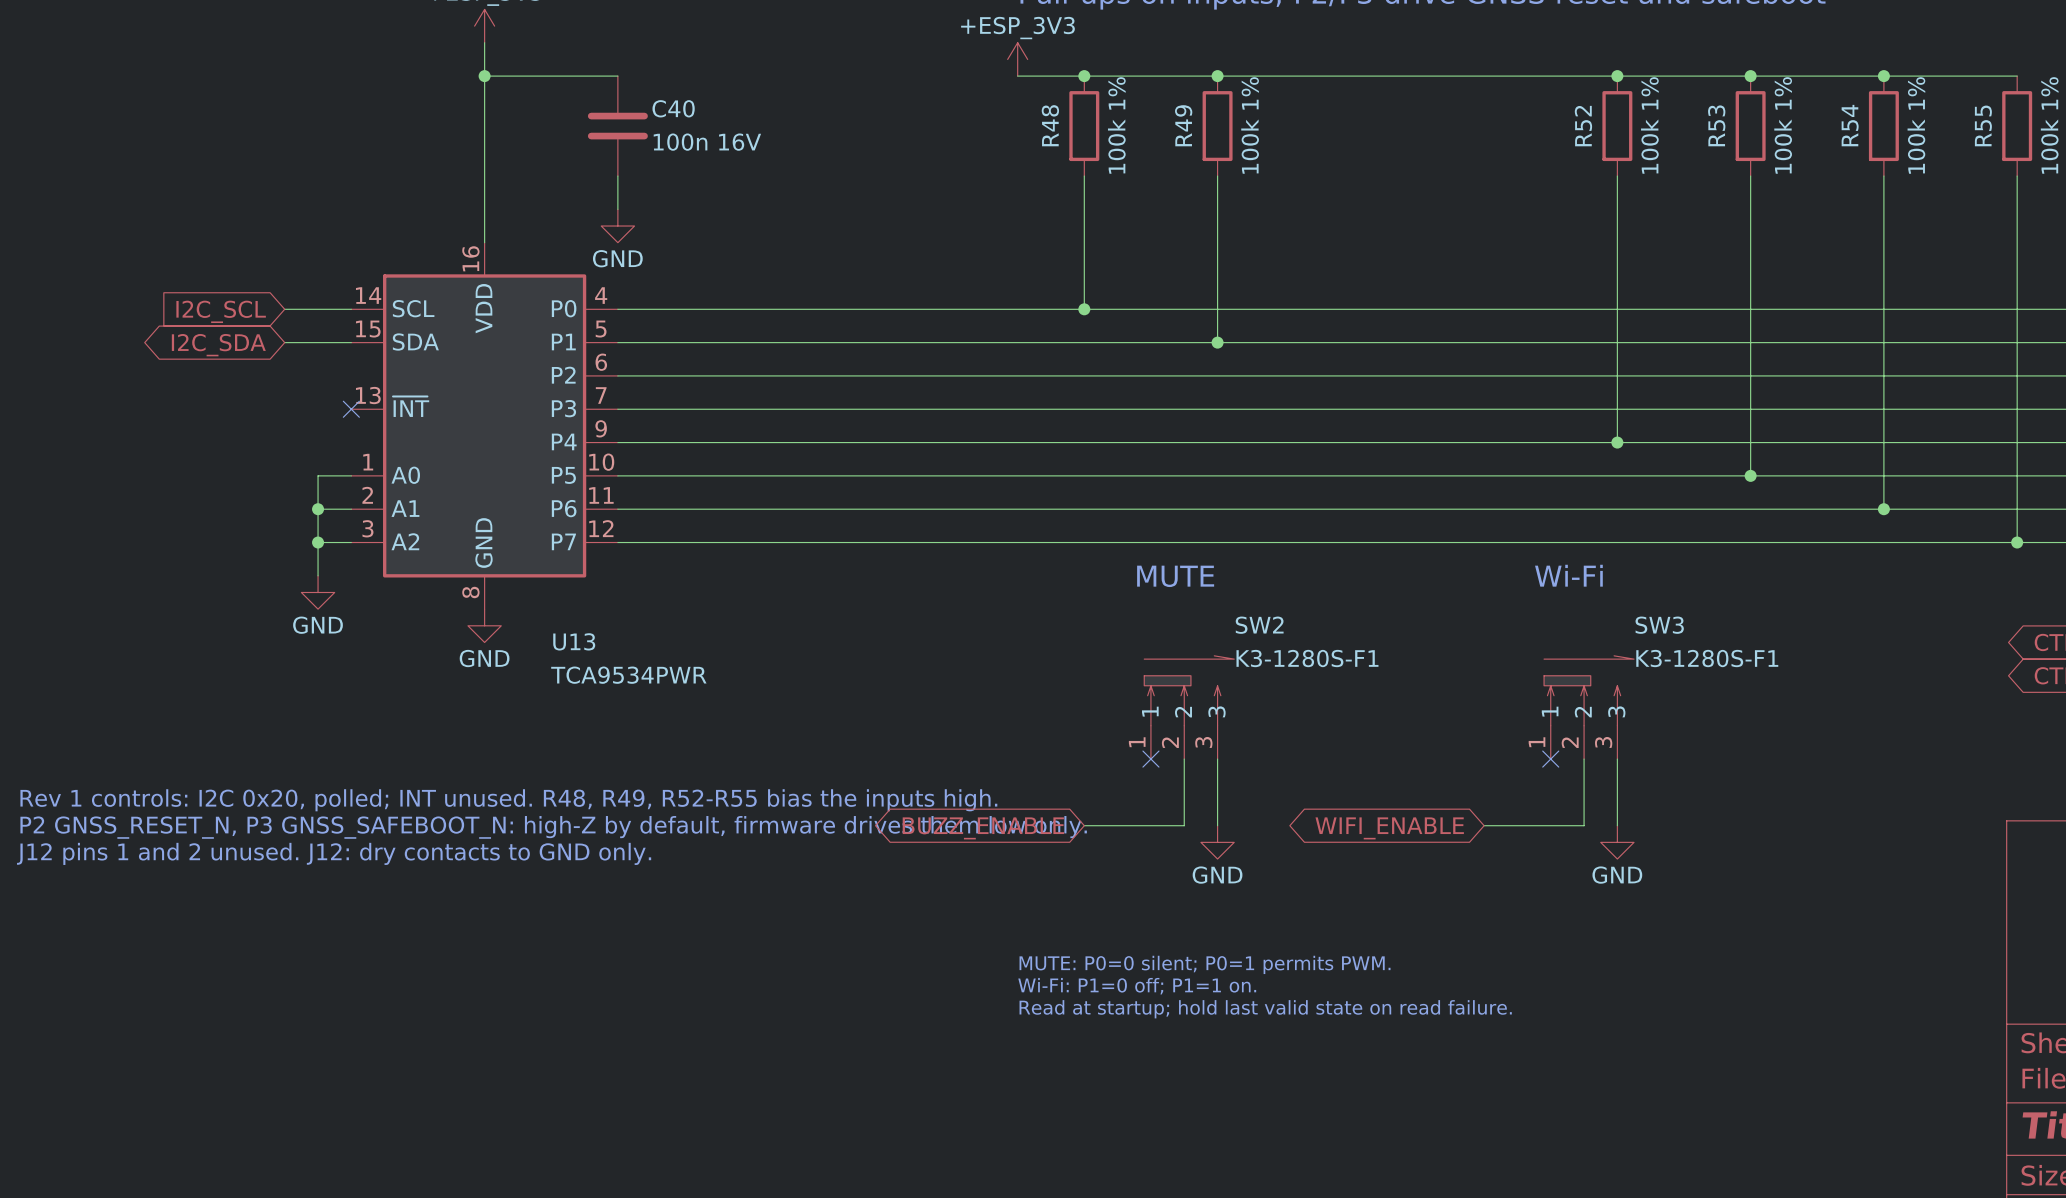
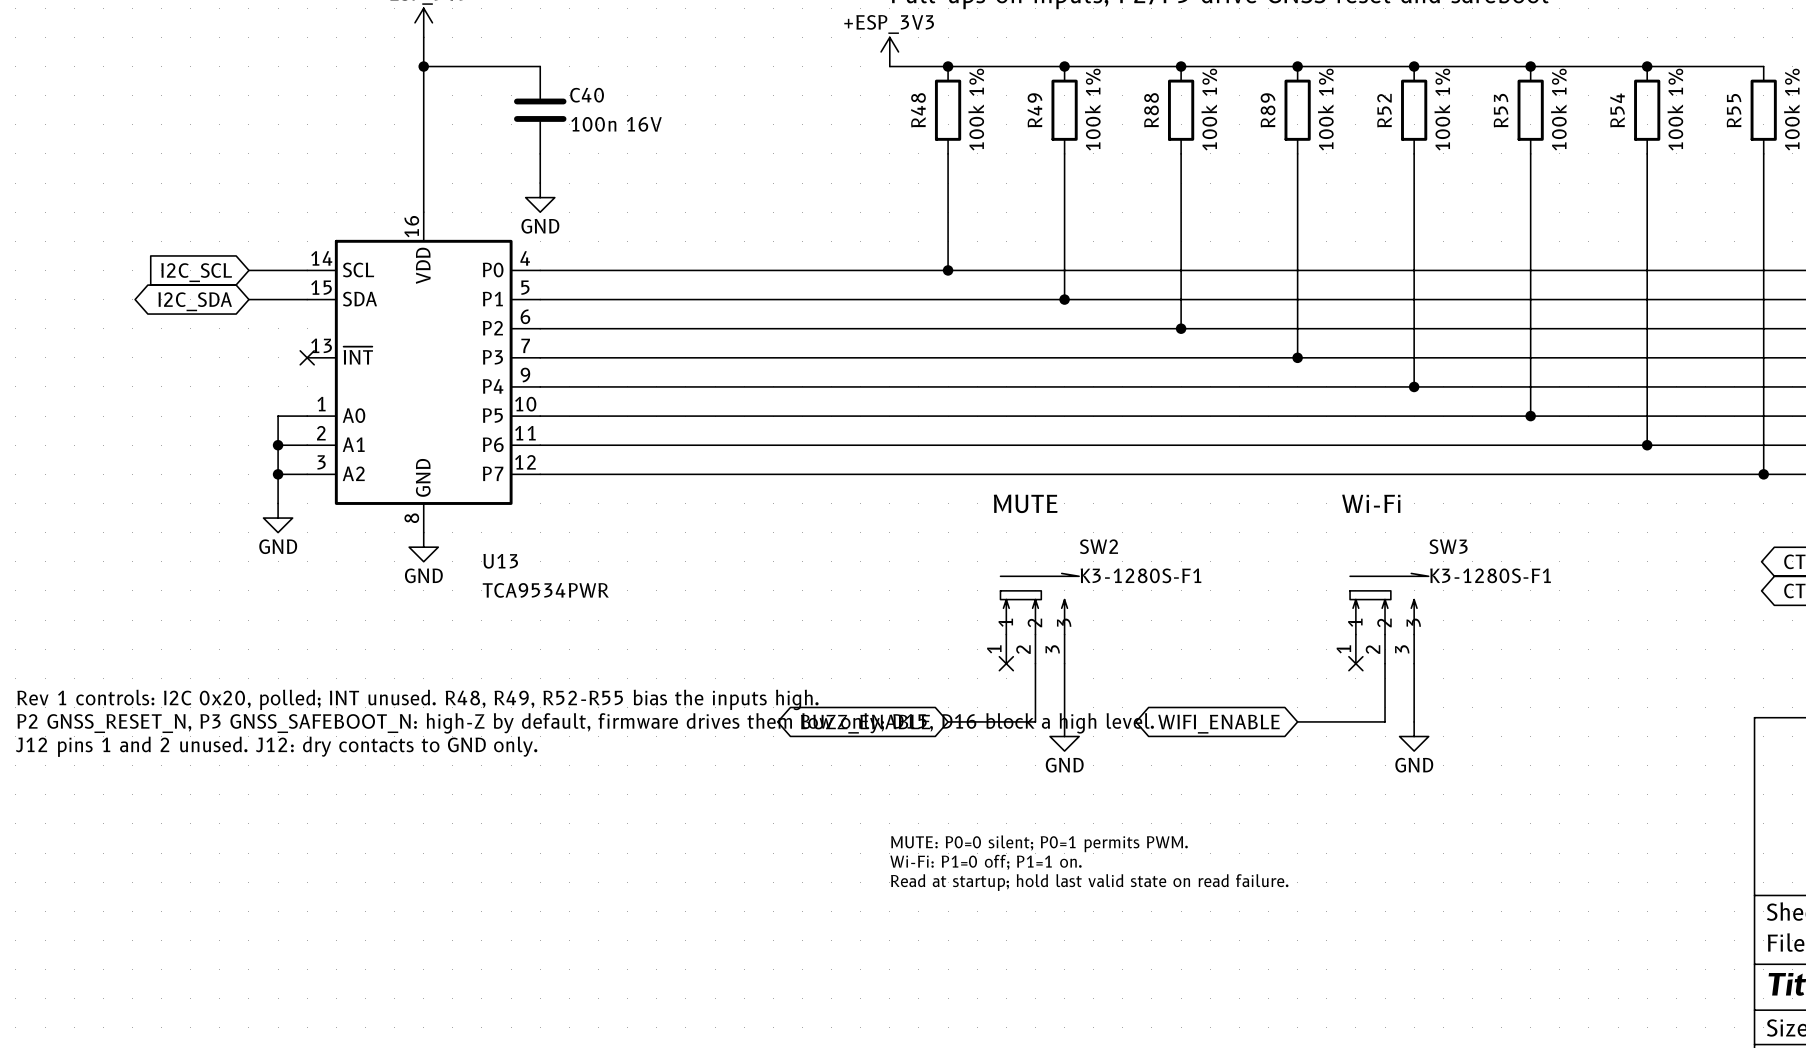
junction: none -> (1181, 66)
junction: none -> (1297, 66)
R88: none -> 100k 1% (1181, 110)
R89: none -> 100k 1% (1297, 110)
wire: none -> (1181, 153) (1181, 328)
wire: none -> (1297, 153) (1297, 357)
junction: none -> (1181, 328)
junction: none -> (1297, 357)
text: P2 GNSS_RESET_N, P3 GNSS_SAFEBOOT_N: high-Z by default, firmware drives them low only. (553, 827) -> P2 GNSS_RESET_N, P3 GNSS_SAFEBOOT_N: high-Z by default, firmware drives them low only; D15, D16 block a high level. (585, 723)

